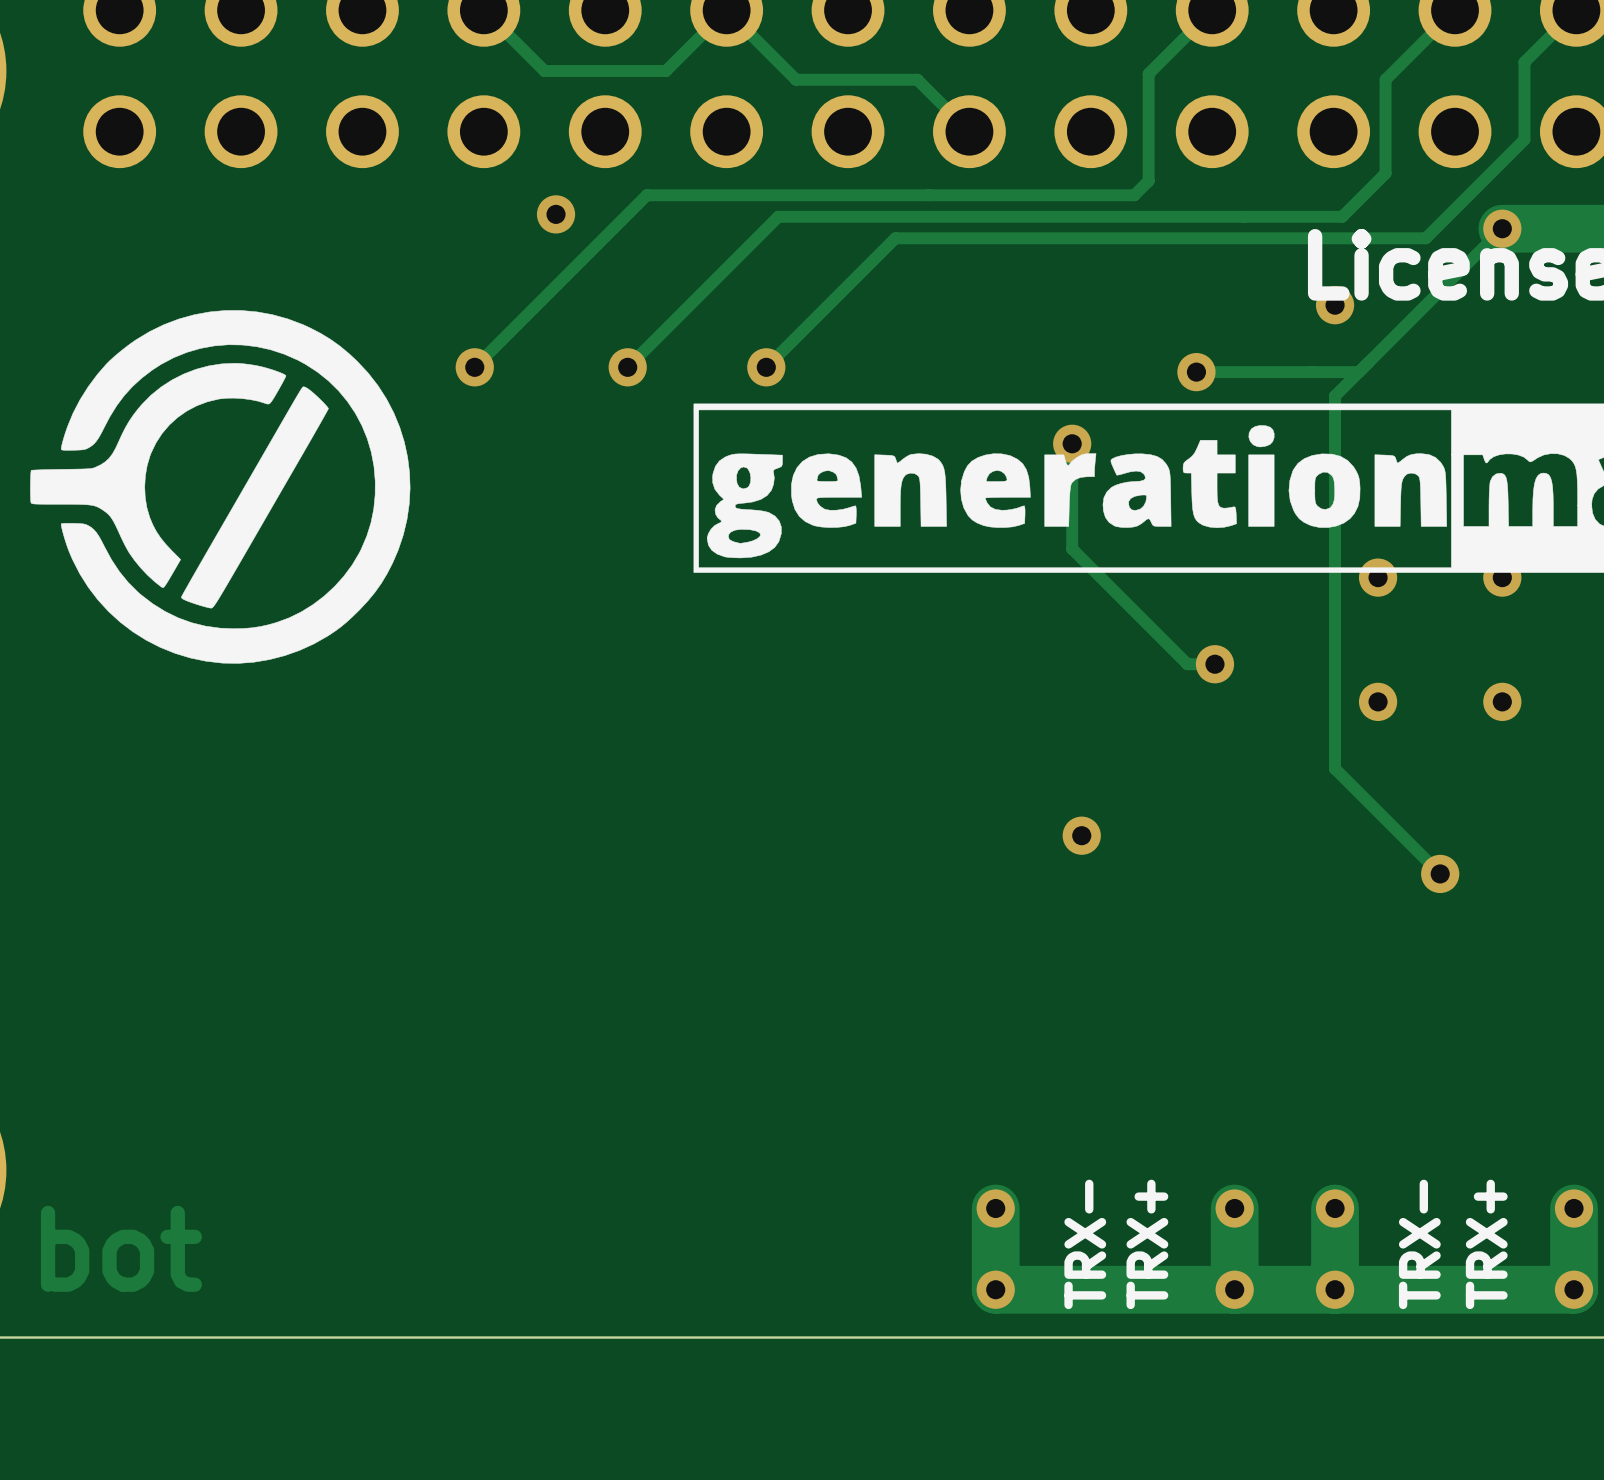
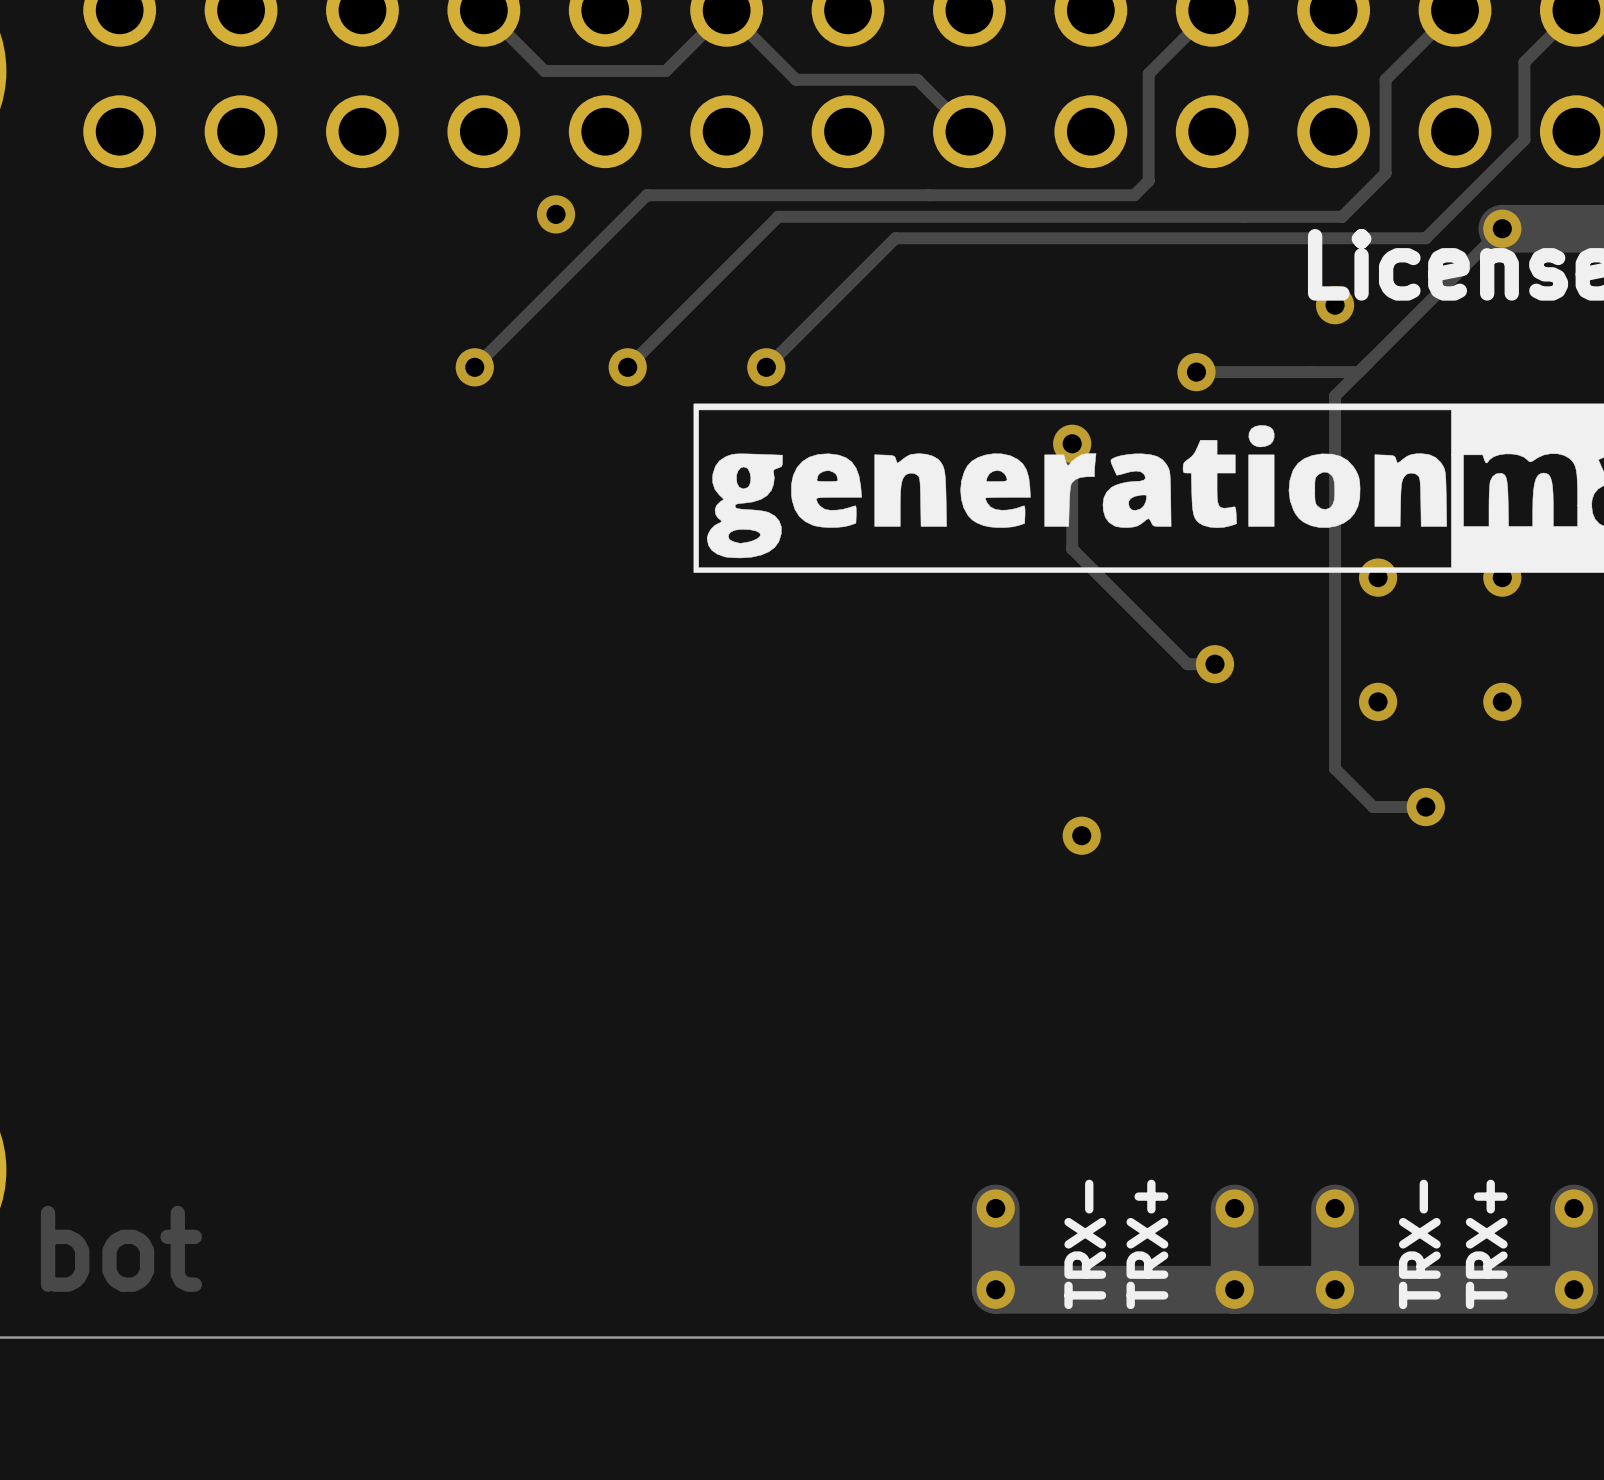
drawing: [30, 310, 411, 664] -> none
track: (1373, 807) (1440, 873) -> (1373, 807) (1425, 807)
via position: (1440, 873) -> (1425, 807)

